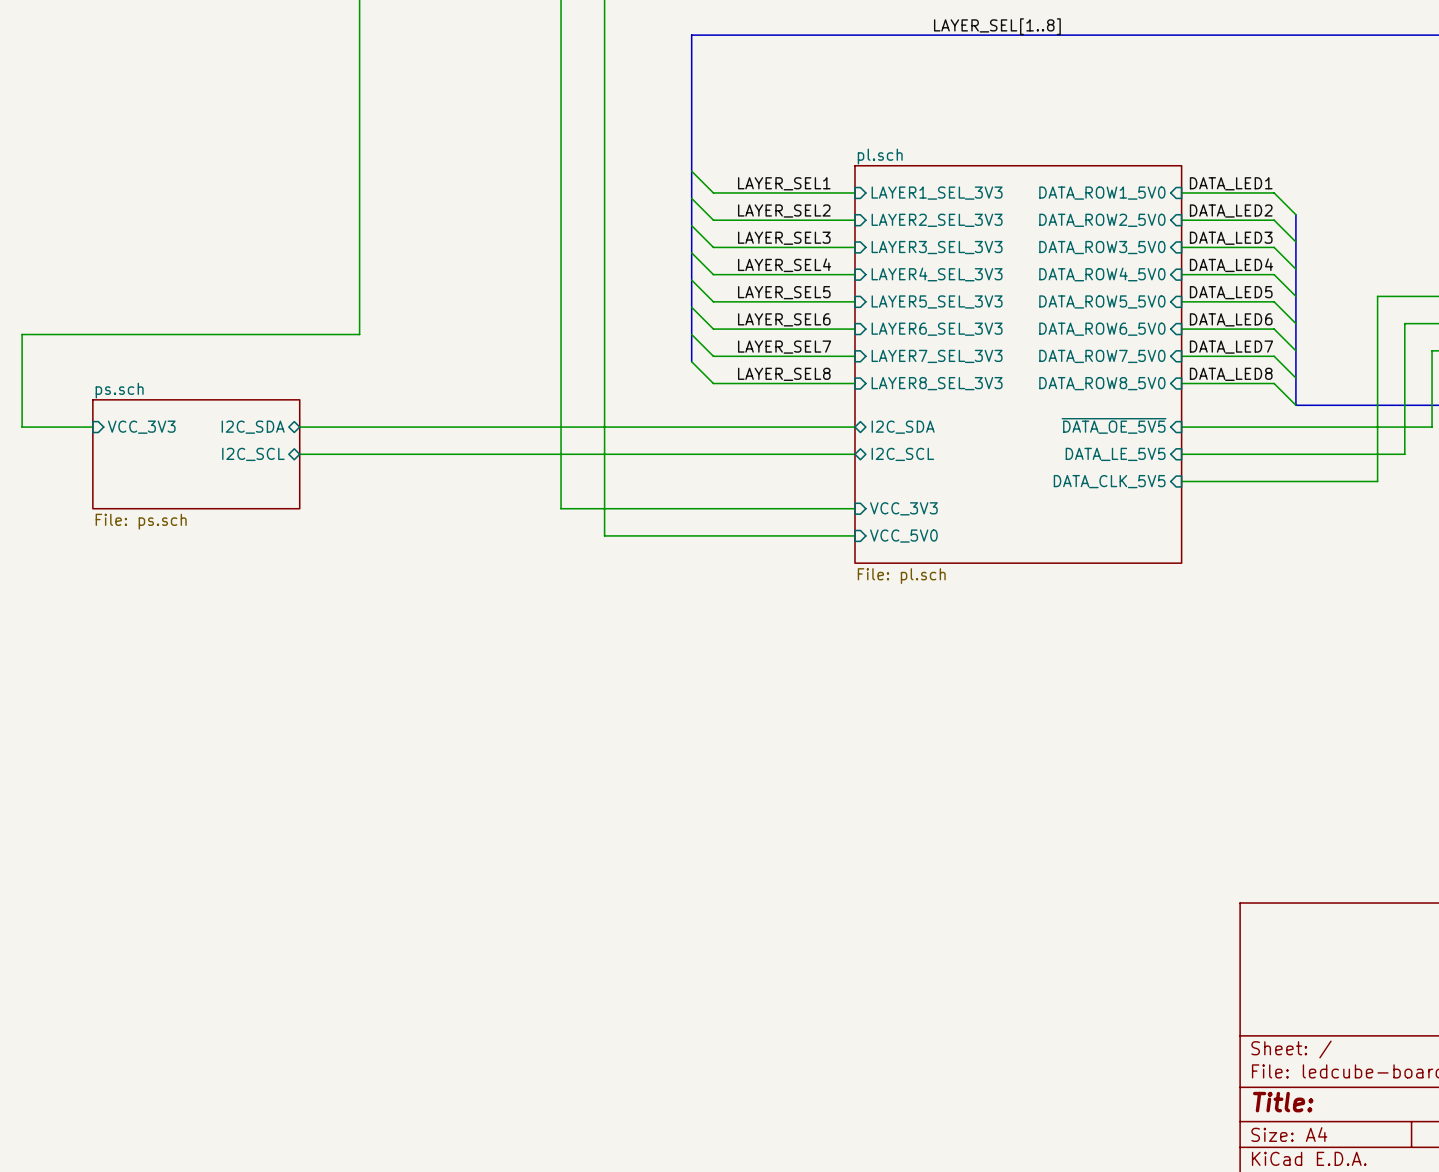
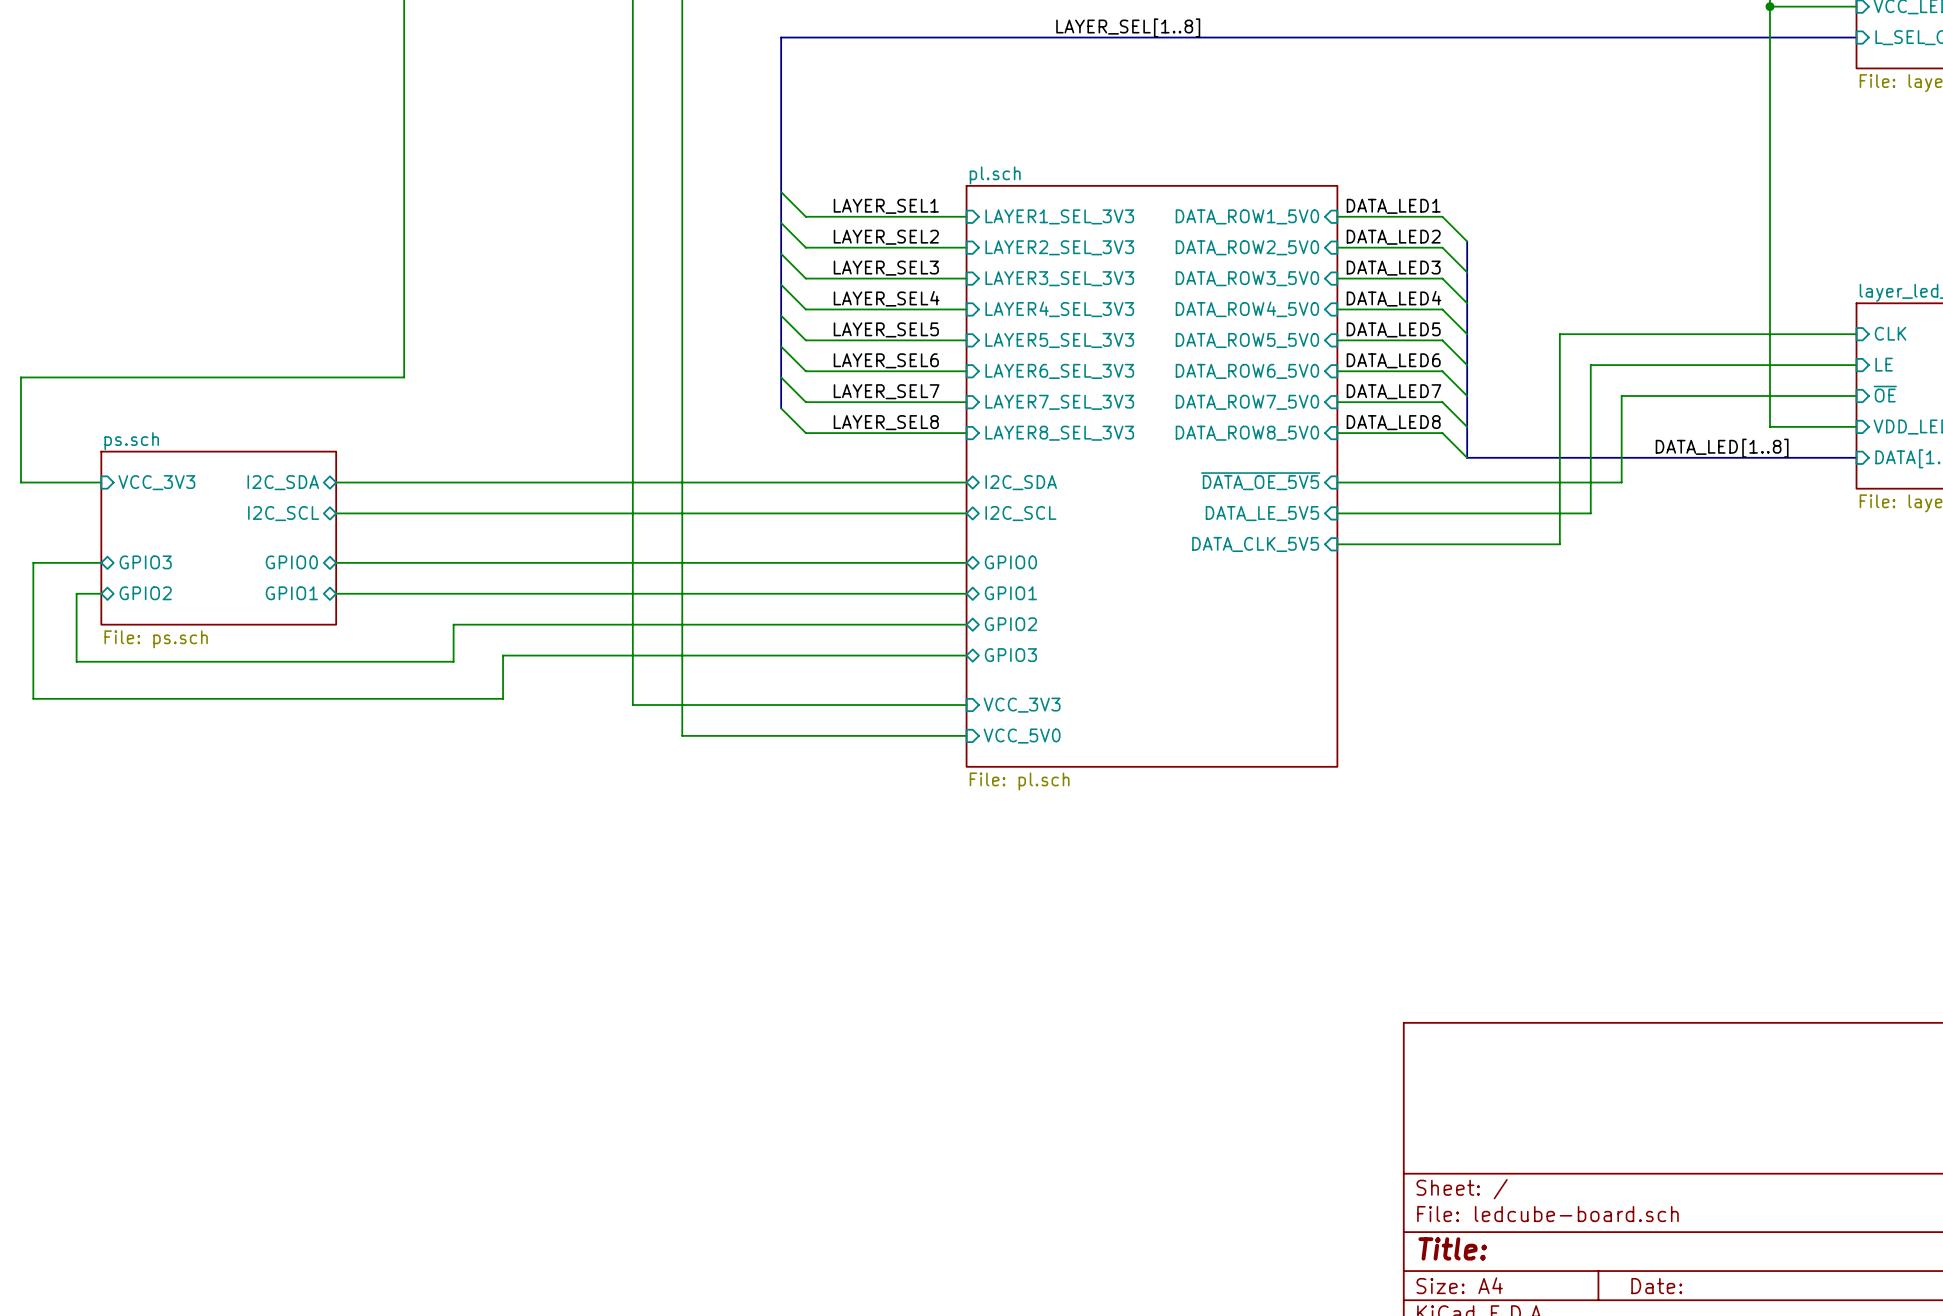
sheet pl.sch: File: pl.sch (1018, 364) -> none
sheet pl.sch: none -> File: pl.sch (1151, 476)
sheet ps.sch: File: ps.sch (196, 454) -> none
sheet ps.sch: none -> File: ps.sch (218, 538)
wire: none -> (101, 562) (33, 562) (33, 698) (503, 698) (503, 655) (966, 655)
sheet pin: none -> GPIO3 (145, 562)
sheet pin: none -> GPIO0 (291, 562)
wire: none -> (336, 562) (966, 562)
sheet pin: none -> GPIO0 (1010, 562)
wire: (561, 508) (854, 508) -> (632, 575) (632, 705) (966, 705)
sheet pin position: VCC_3V3 (903, 508) -> VCC_3V3 (1022, 705)
sheet pin: none -> GPIO2 (145, 593)
sheet pin: none -> GPIO1 (291, 593)
sheet pin: none -> GPIO1 (1010, 593)
wire: none -> (101, 593) (76, 593) (76, 661) (453, 661) (453, 624) (966, 624)
wire: none -> (336, 593) (966, 593)
wire: (604, 535) (854, 535) -> (682, 606) (682, 735) (966, 735)
sheet pin position: VCC_5V0 (903, 536) -> VCC_5V0 (1022, 736)
sheet pin: none -> GPIO2 (1010, 624)
sheet pin: none -> GPIO3 (1010, 655)

